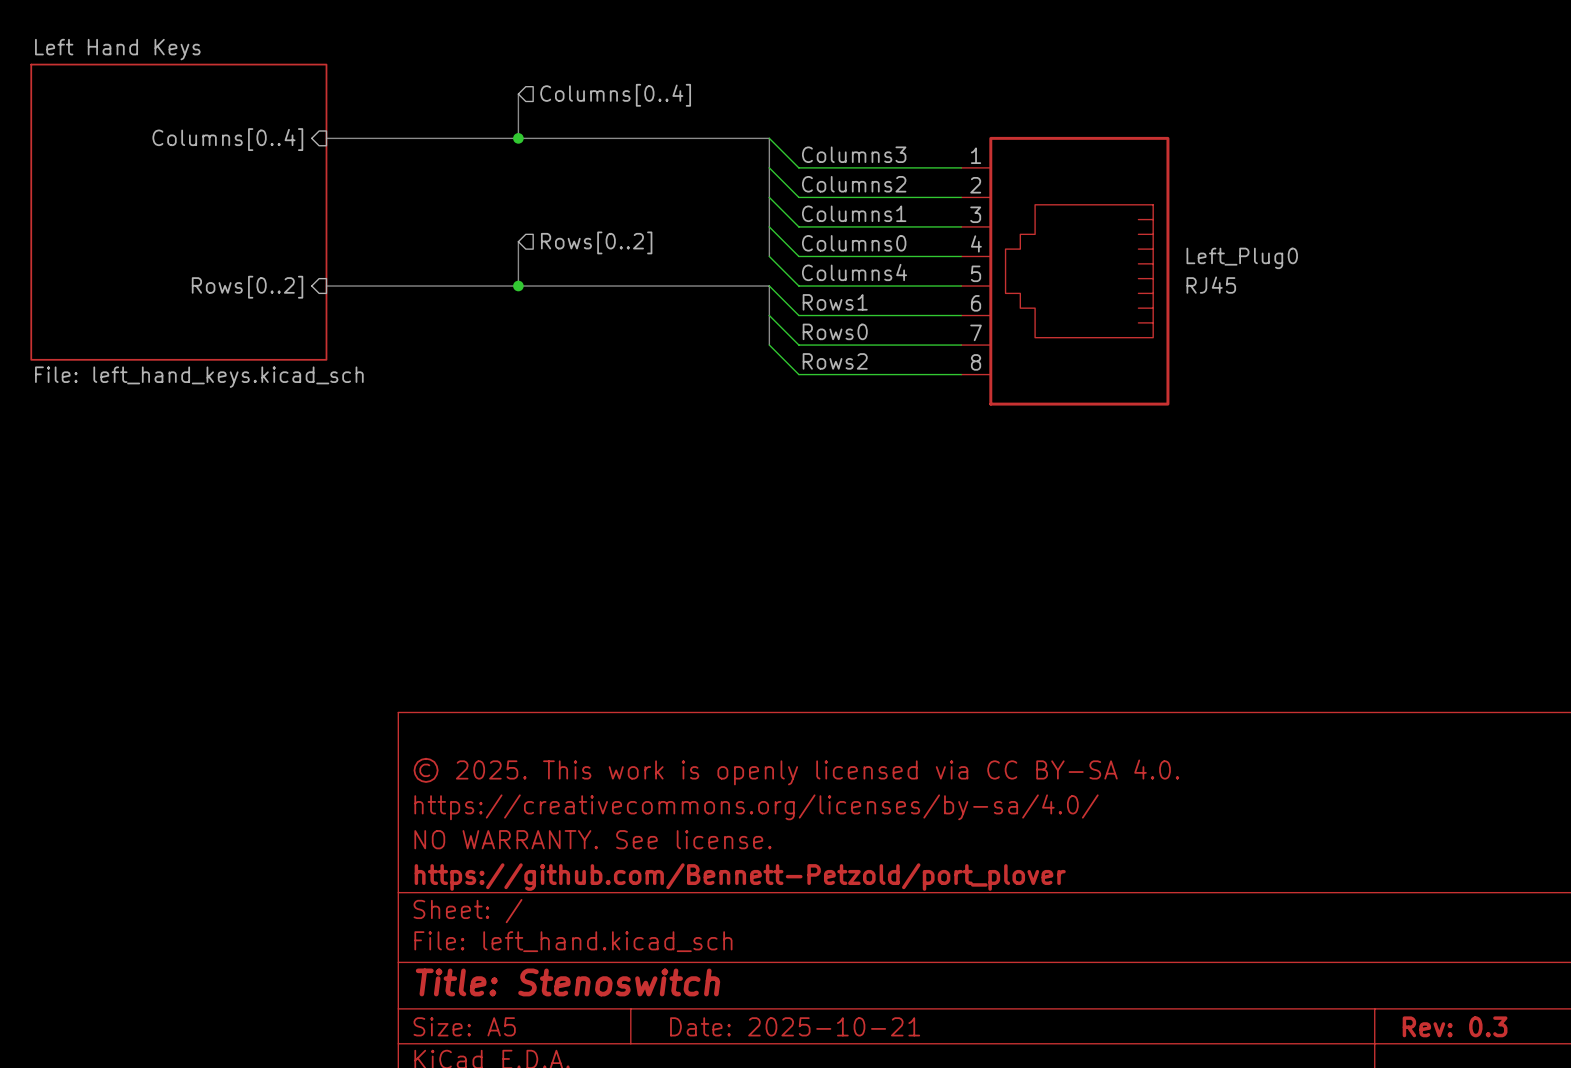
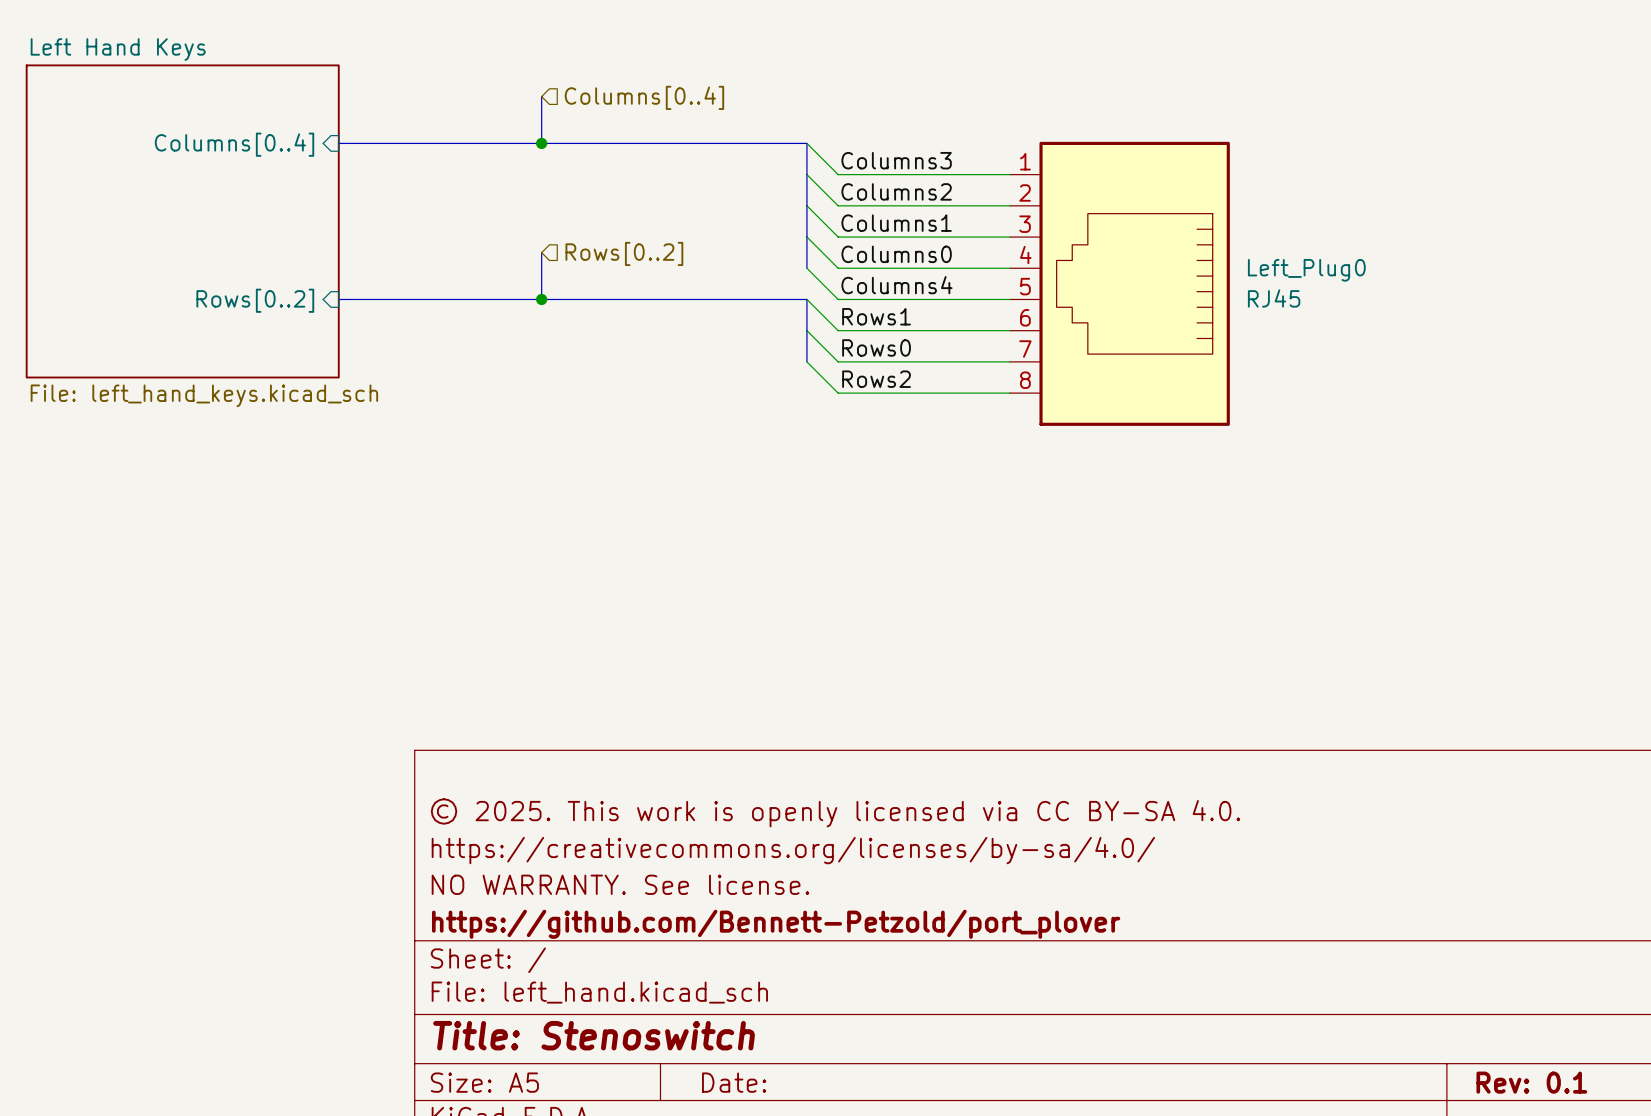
title block: Date: 2025-10-21 (795, 1026) -> Date: (734, 1082)
title block: Rev: 0.3 (1455, 1026) -> Rev: 0.1 (1531, 1082)

